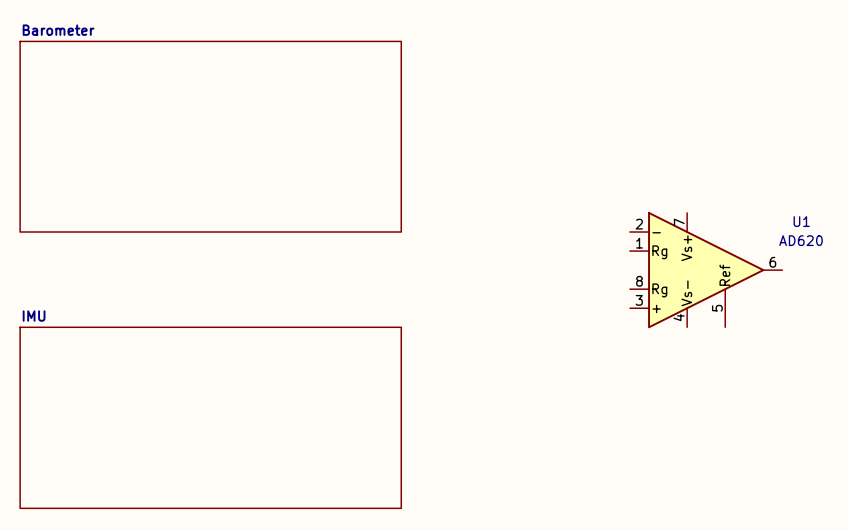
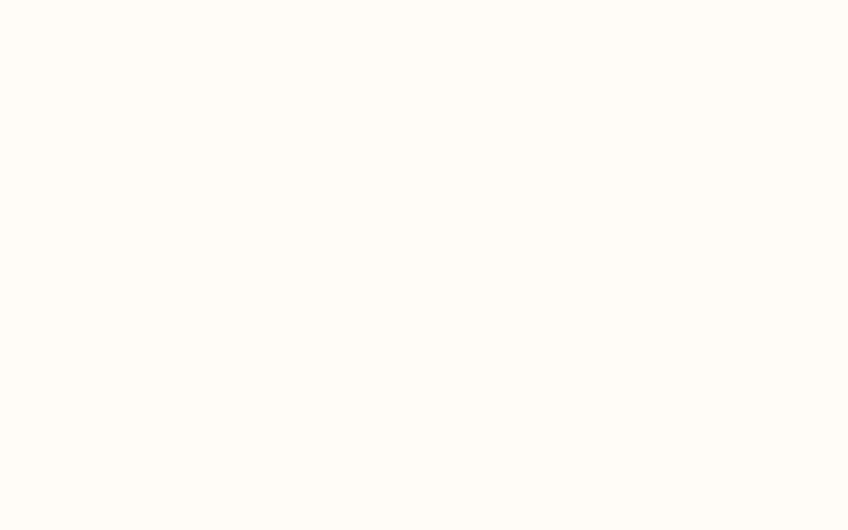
sheet Barometer: (210, 136) -> none
U1: AD620 (706, 270) -> none
sheet IMU: (210, 417) -> none

